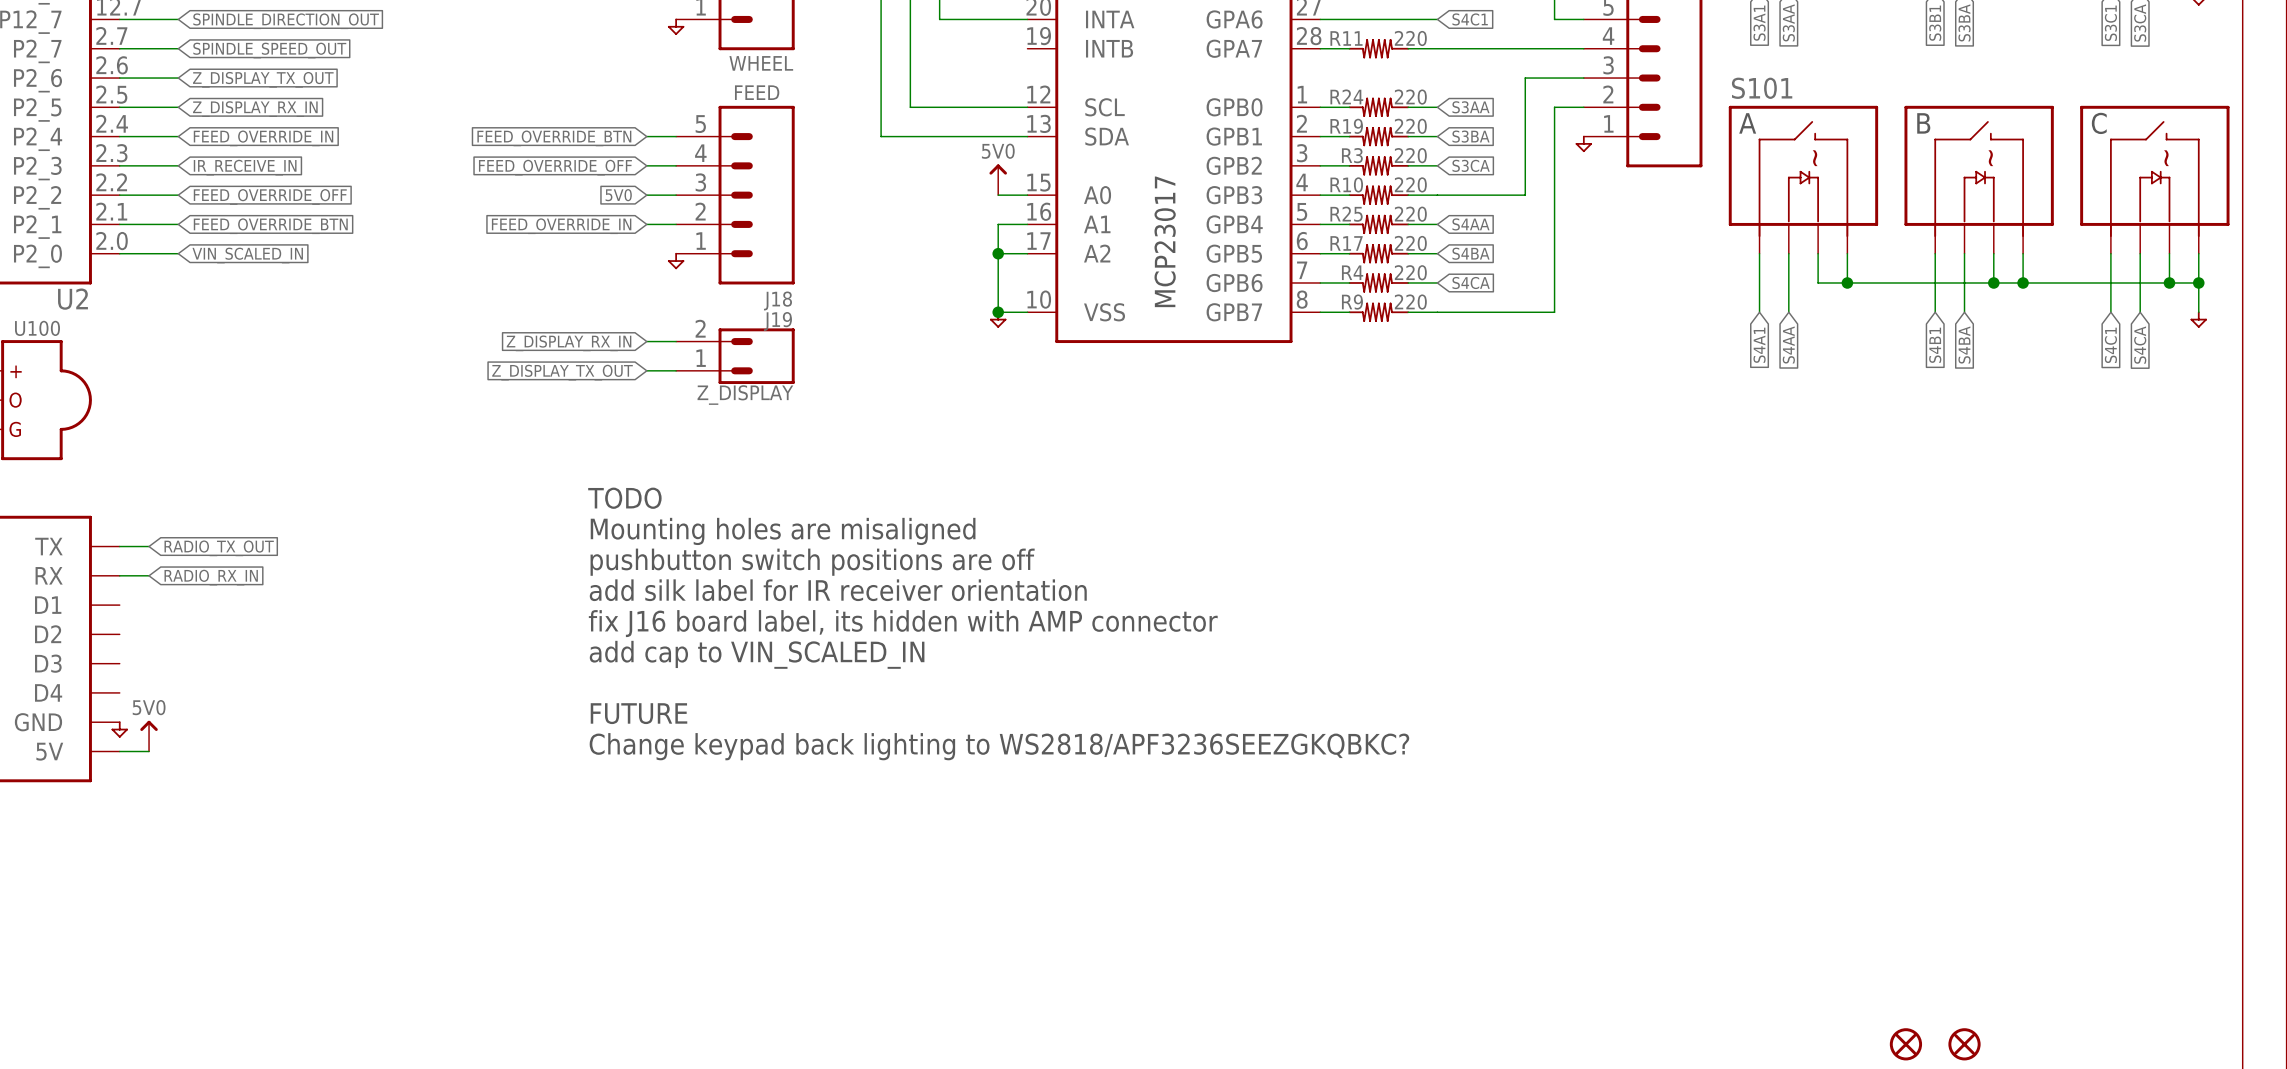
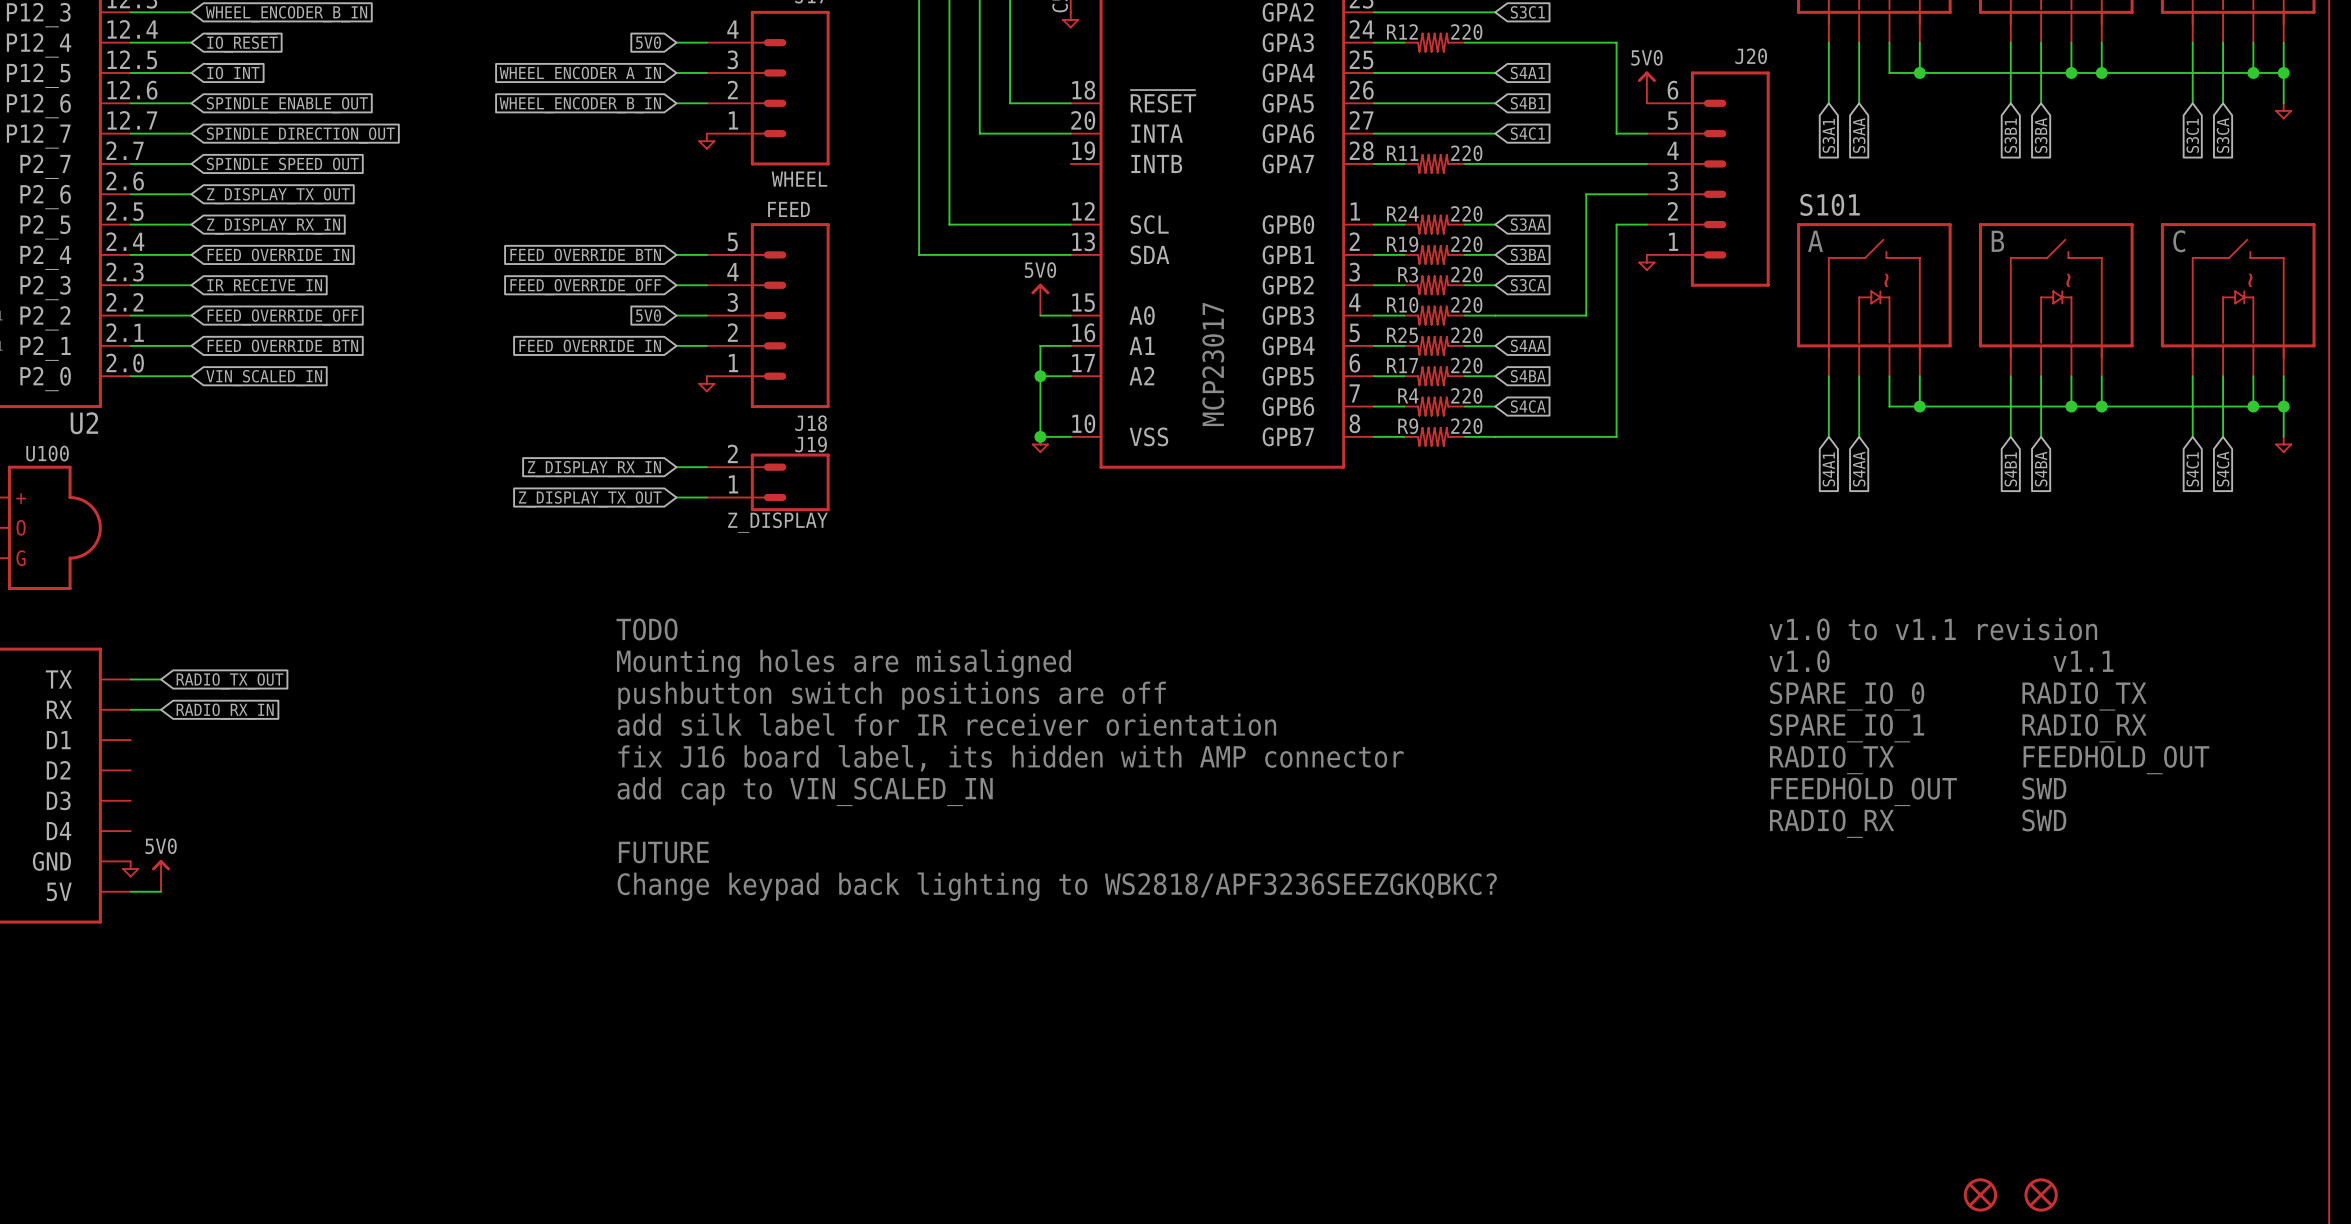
text: none -> v1.0 to v1.1 revision (1933, 629)
text: none -> v1.0 v1.1 (1941, 661)
text: none -> SPARE_IO_0 RADIO_TX (1958, 696)
text: none -> SPARE_IO_1 RADIO_RX (1958, 728)
text: none -> RADIO_TX FEEDHOLD_OUT (1989, 760)
text: none -> FEEDHOLD_OUT SWD (1918, 791)
text: none -> RADIO_RX SWD (1918, 823)

